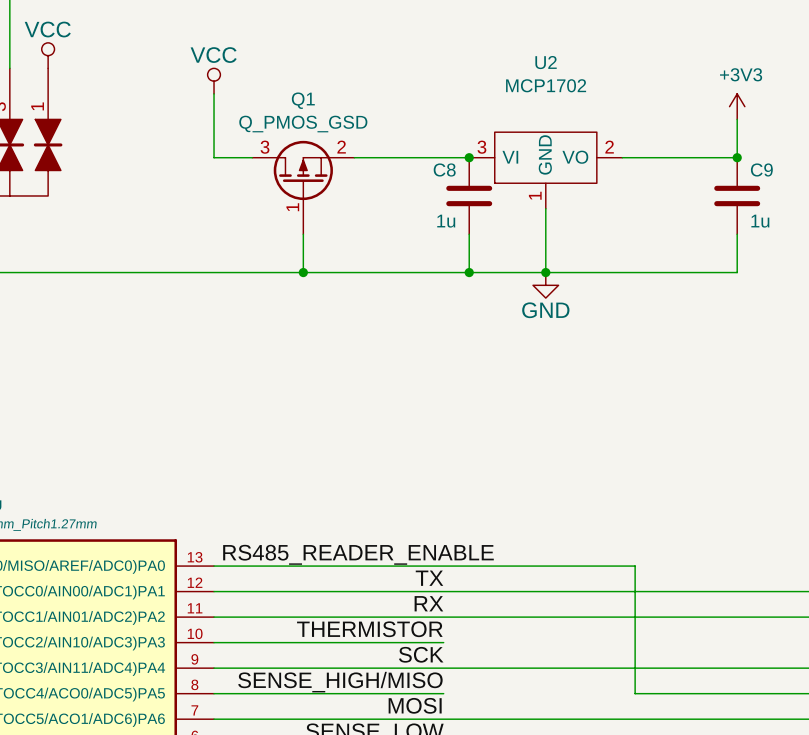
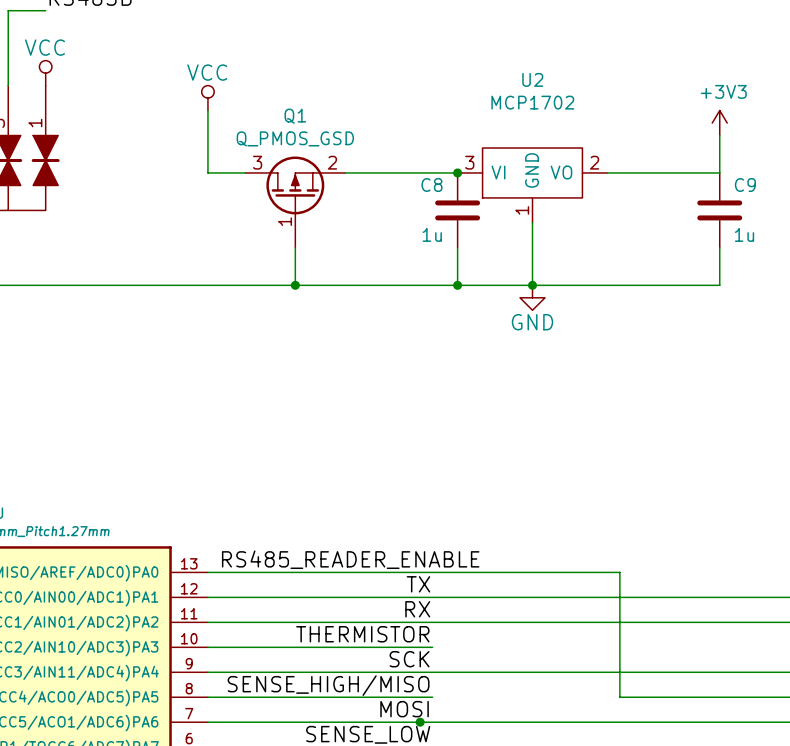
junction: (737, 157) -> none
junction: none -> (420, 722)

